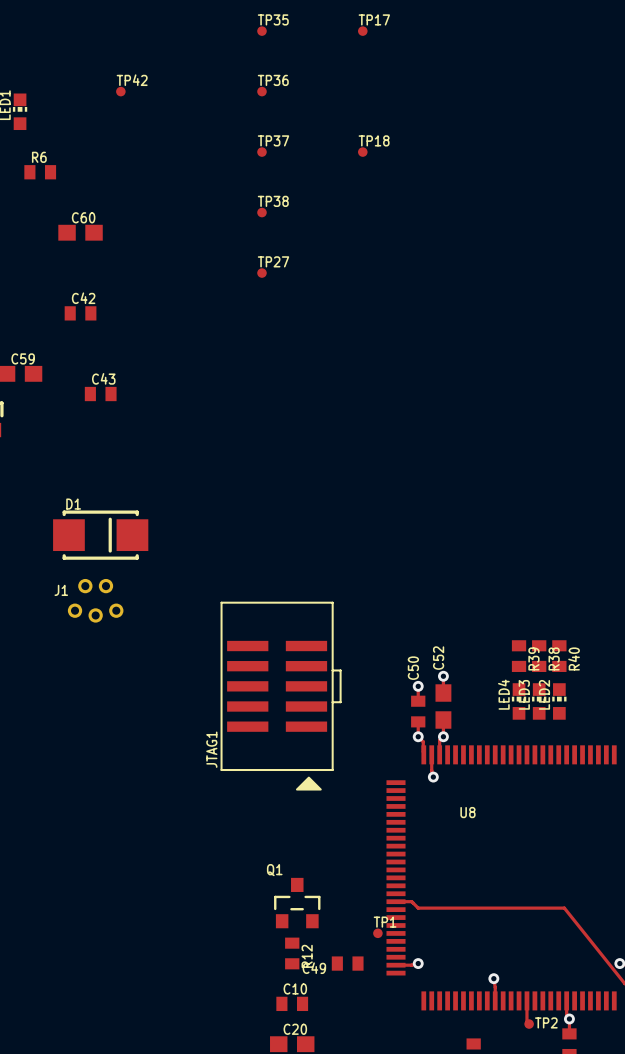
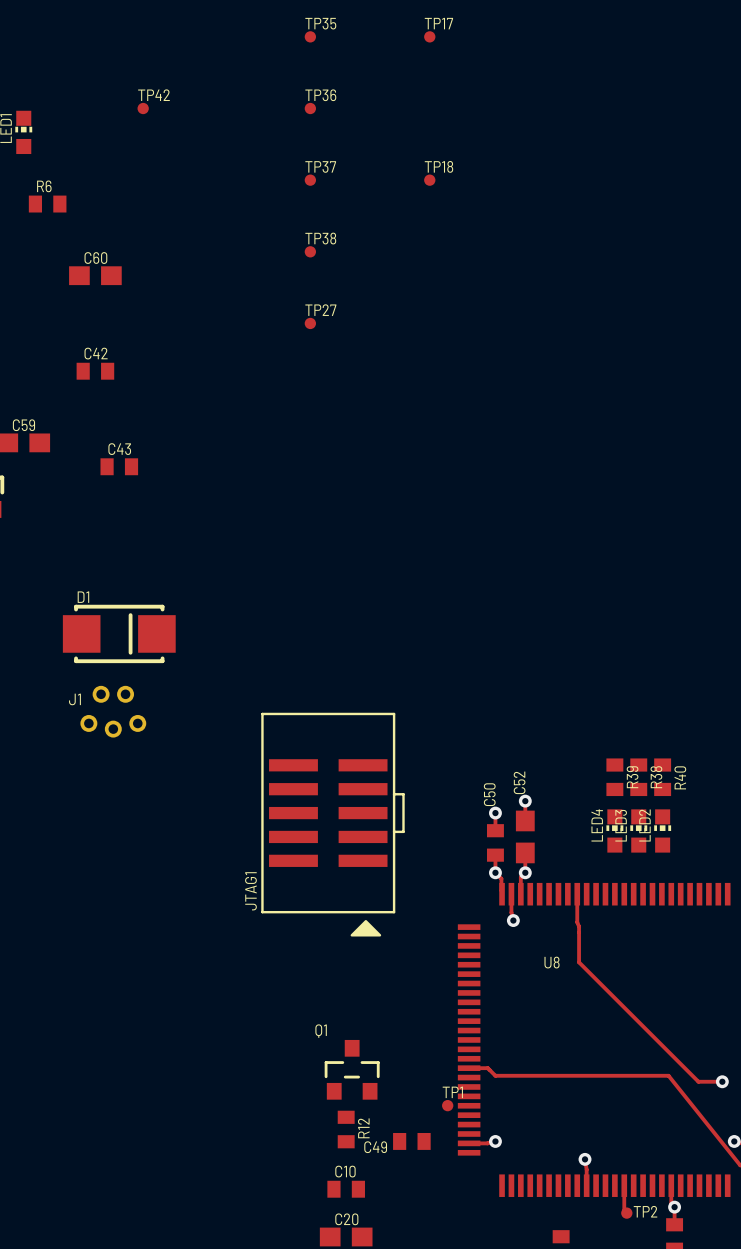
track: none -> (577, 894) (579, 962) (698, 1081) (722, 1081)
via: none -> (722, 1081)

